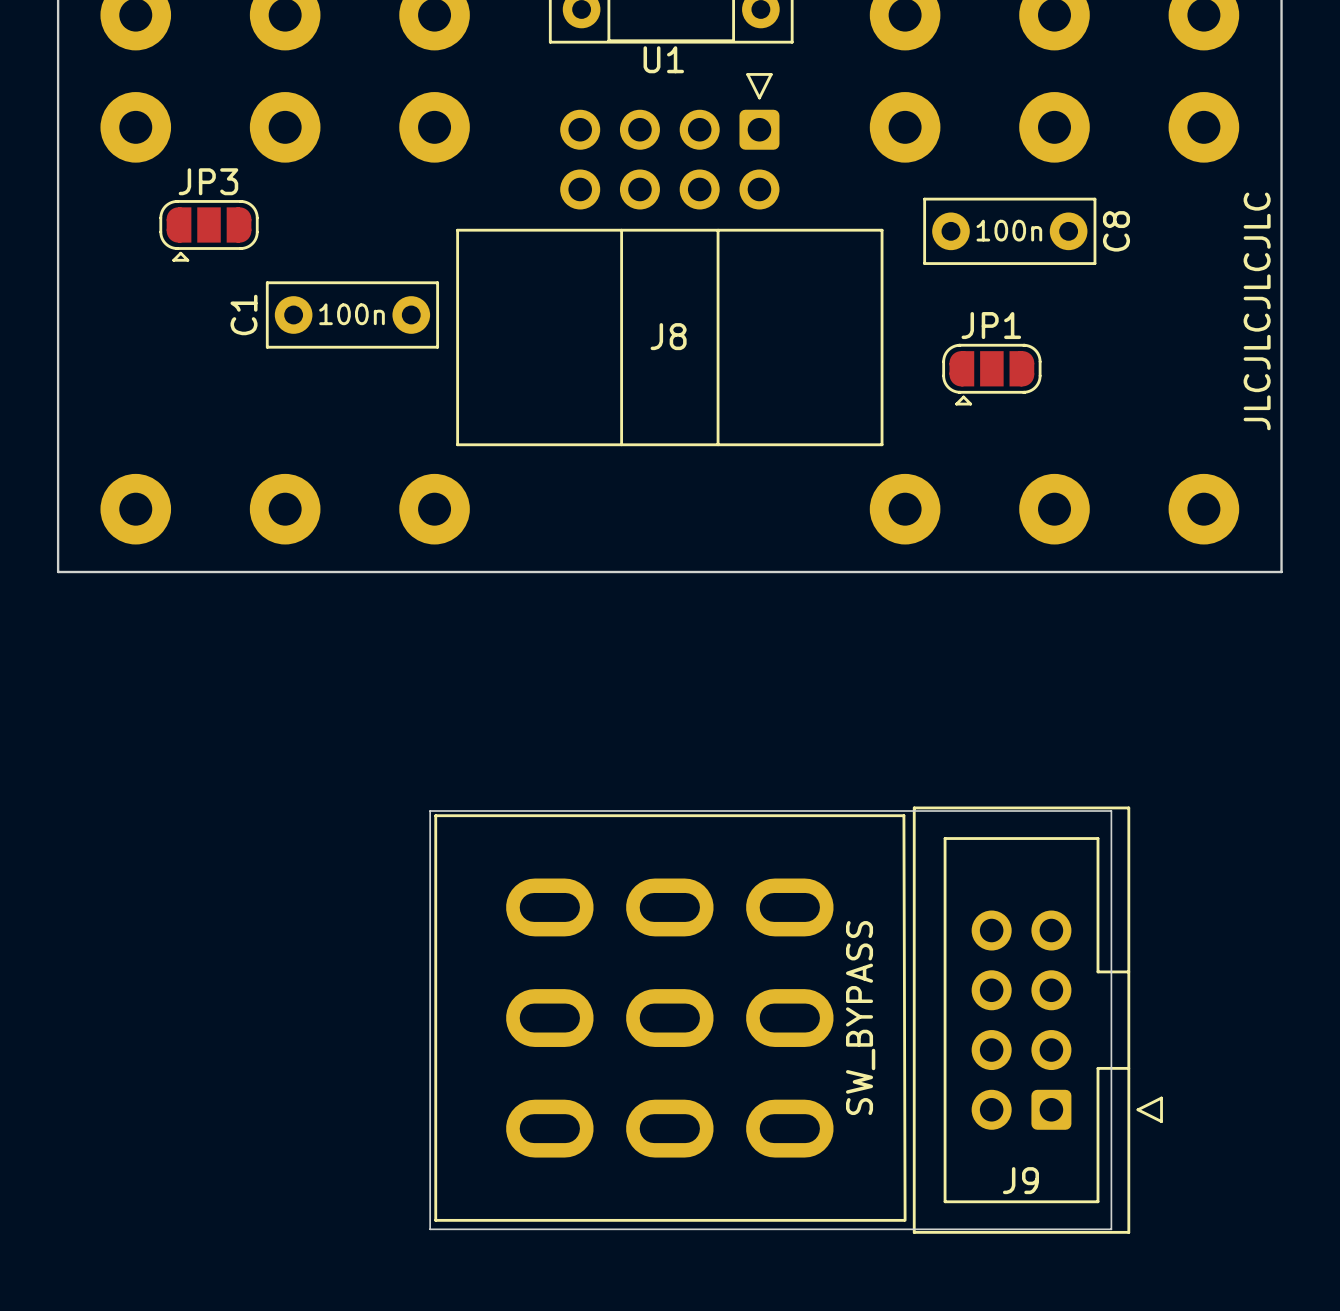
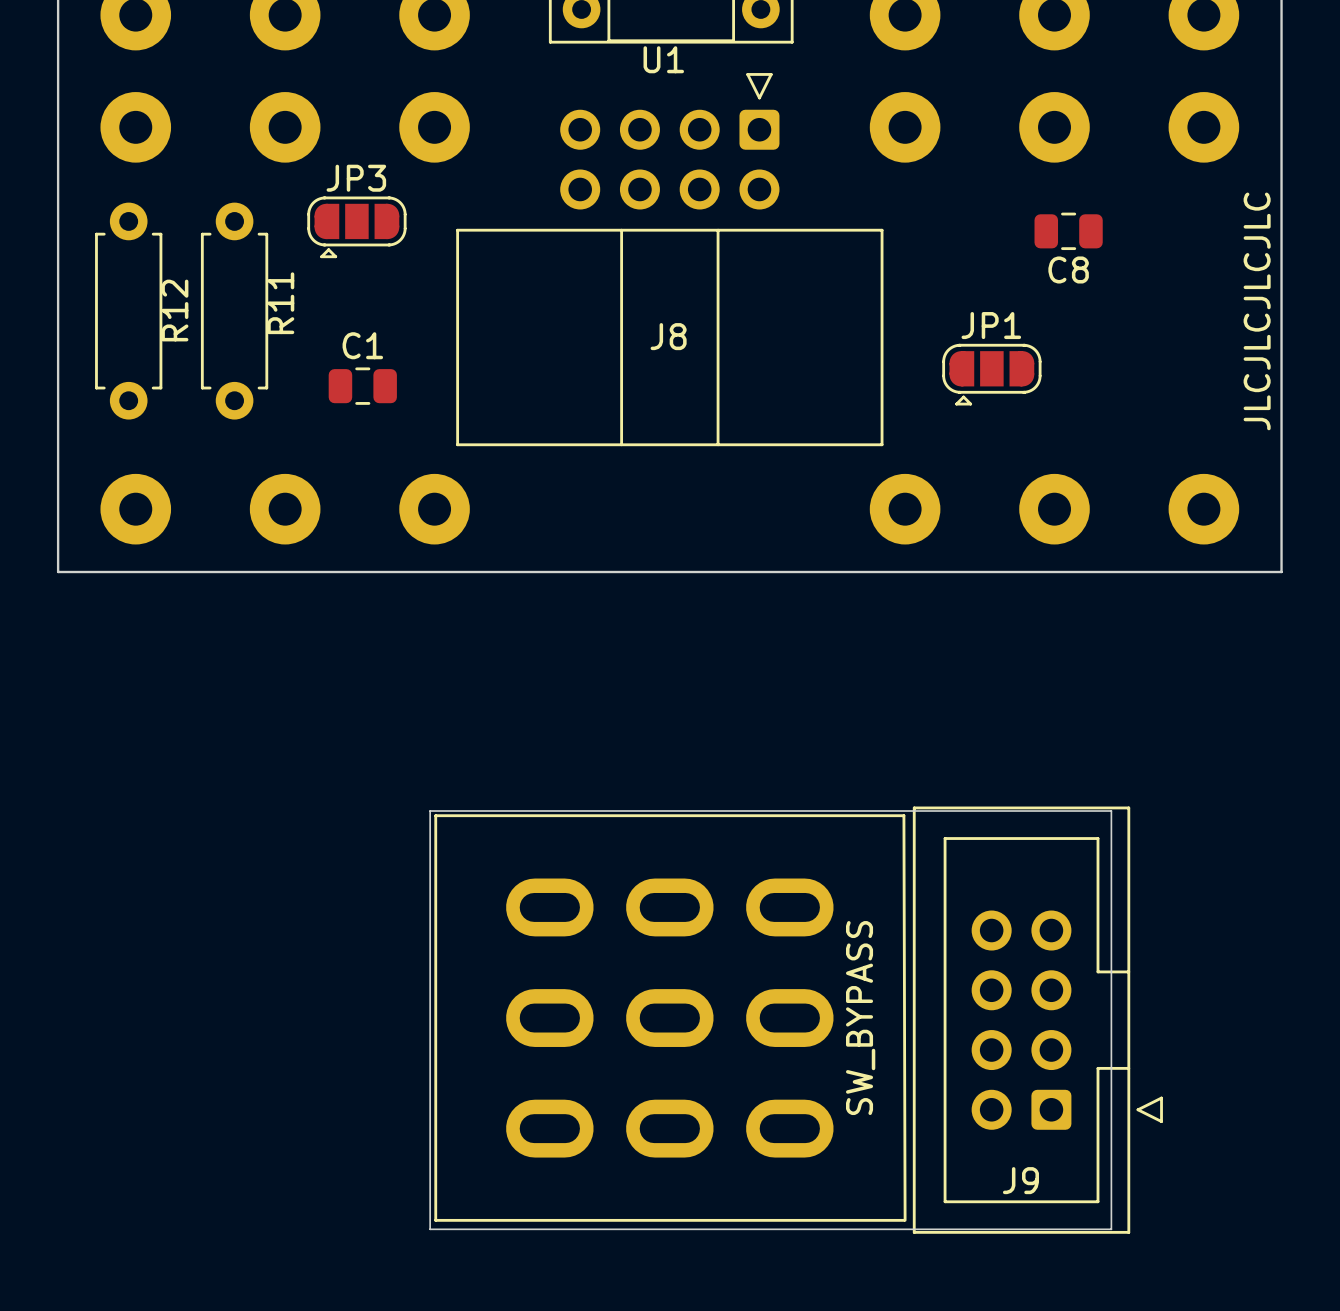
C8 footprint: [923, 197, 1097, 265] -> [1034, 212, 1103, 251]
JP3 position: (209, 230) -> (356, 227)
C8 value: 100n (1009, 230) -> none
C8 name position: C8 (1116, 231) -> C8 (1068, 269)
C1 footprint: [265, 281, 440, 349] -> [328, 367, 397, 405]
R12: none -> (128, 311)
R11: none -> (234, 311)
C1 name position: C1 (244, 314) -> C1 (362, 345)
C1 value: 100n (352, 314) -> none

